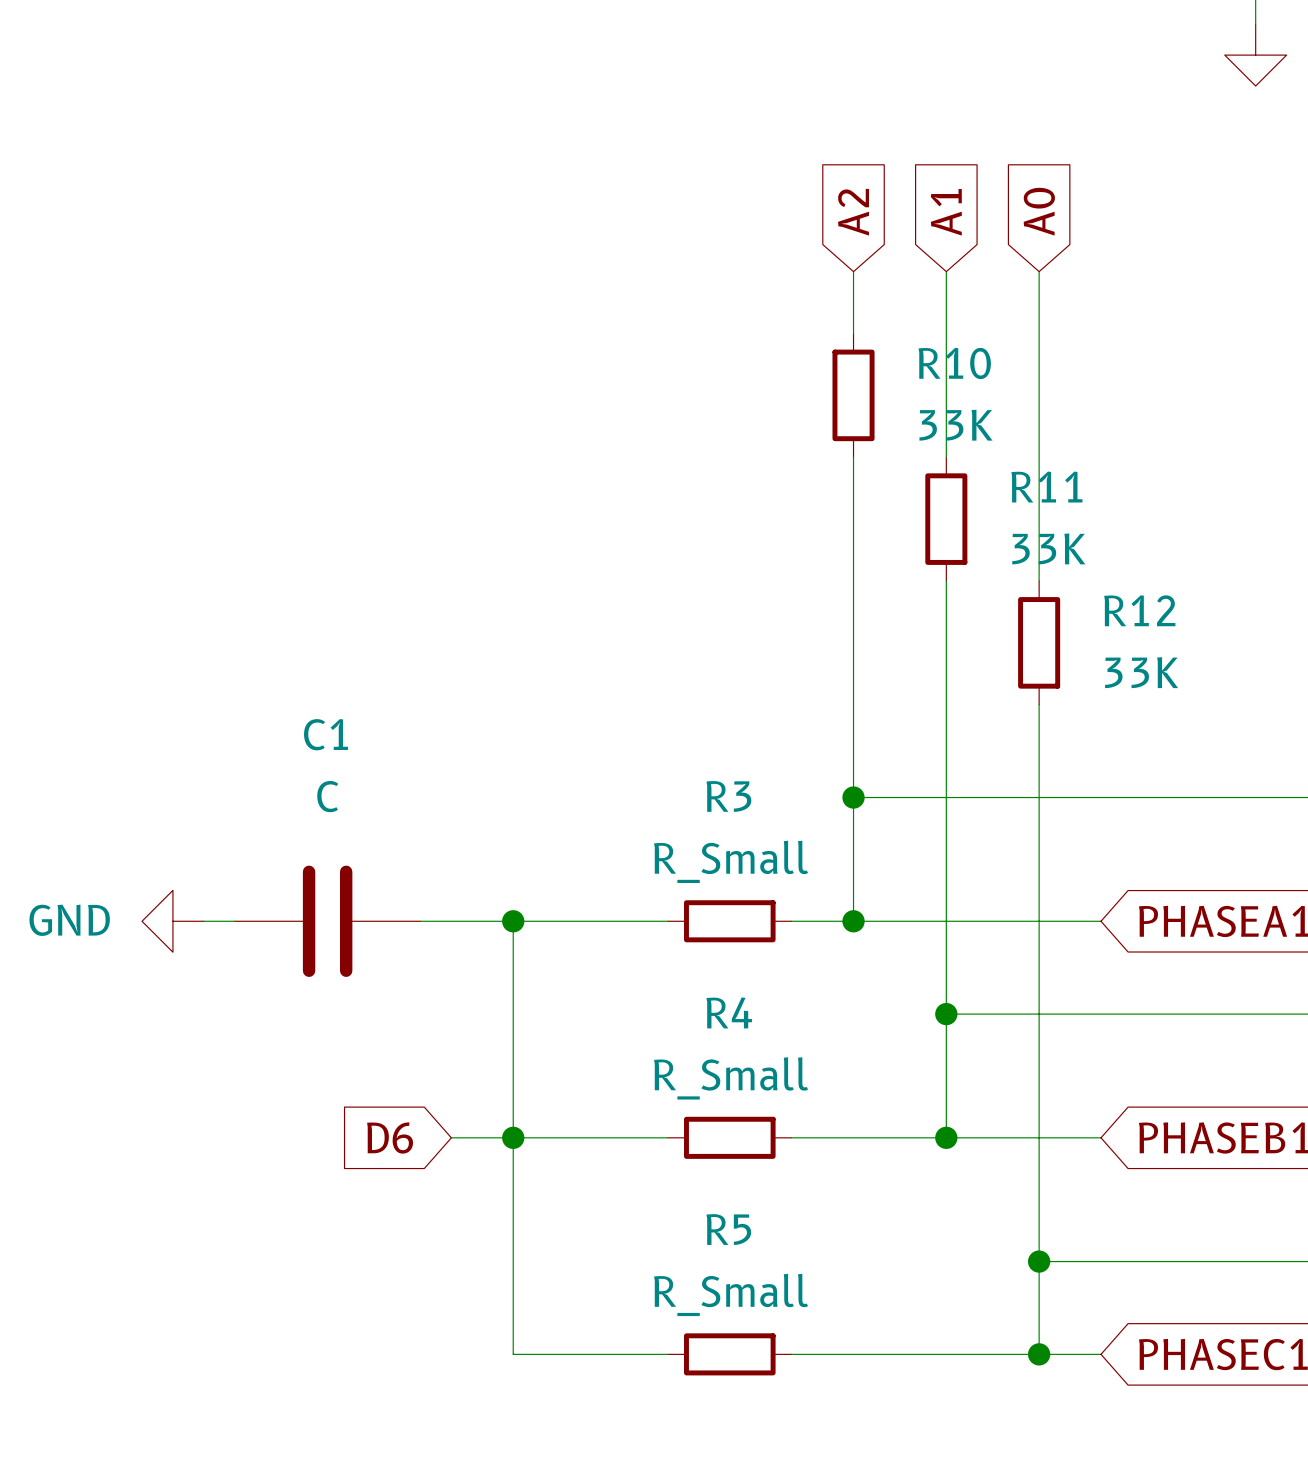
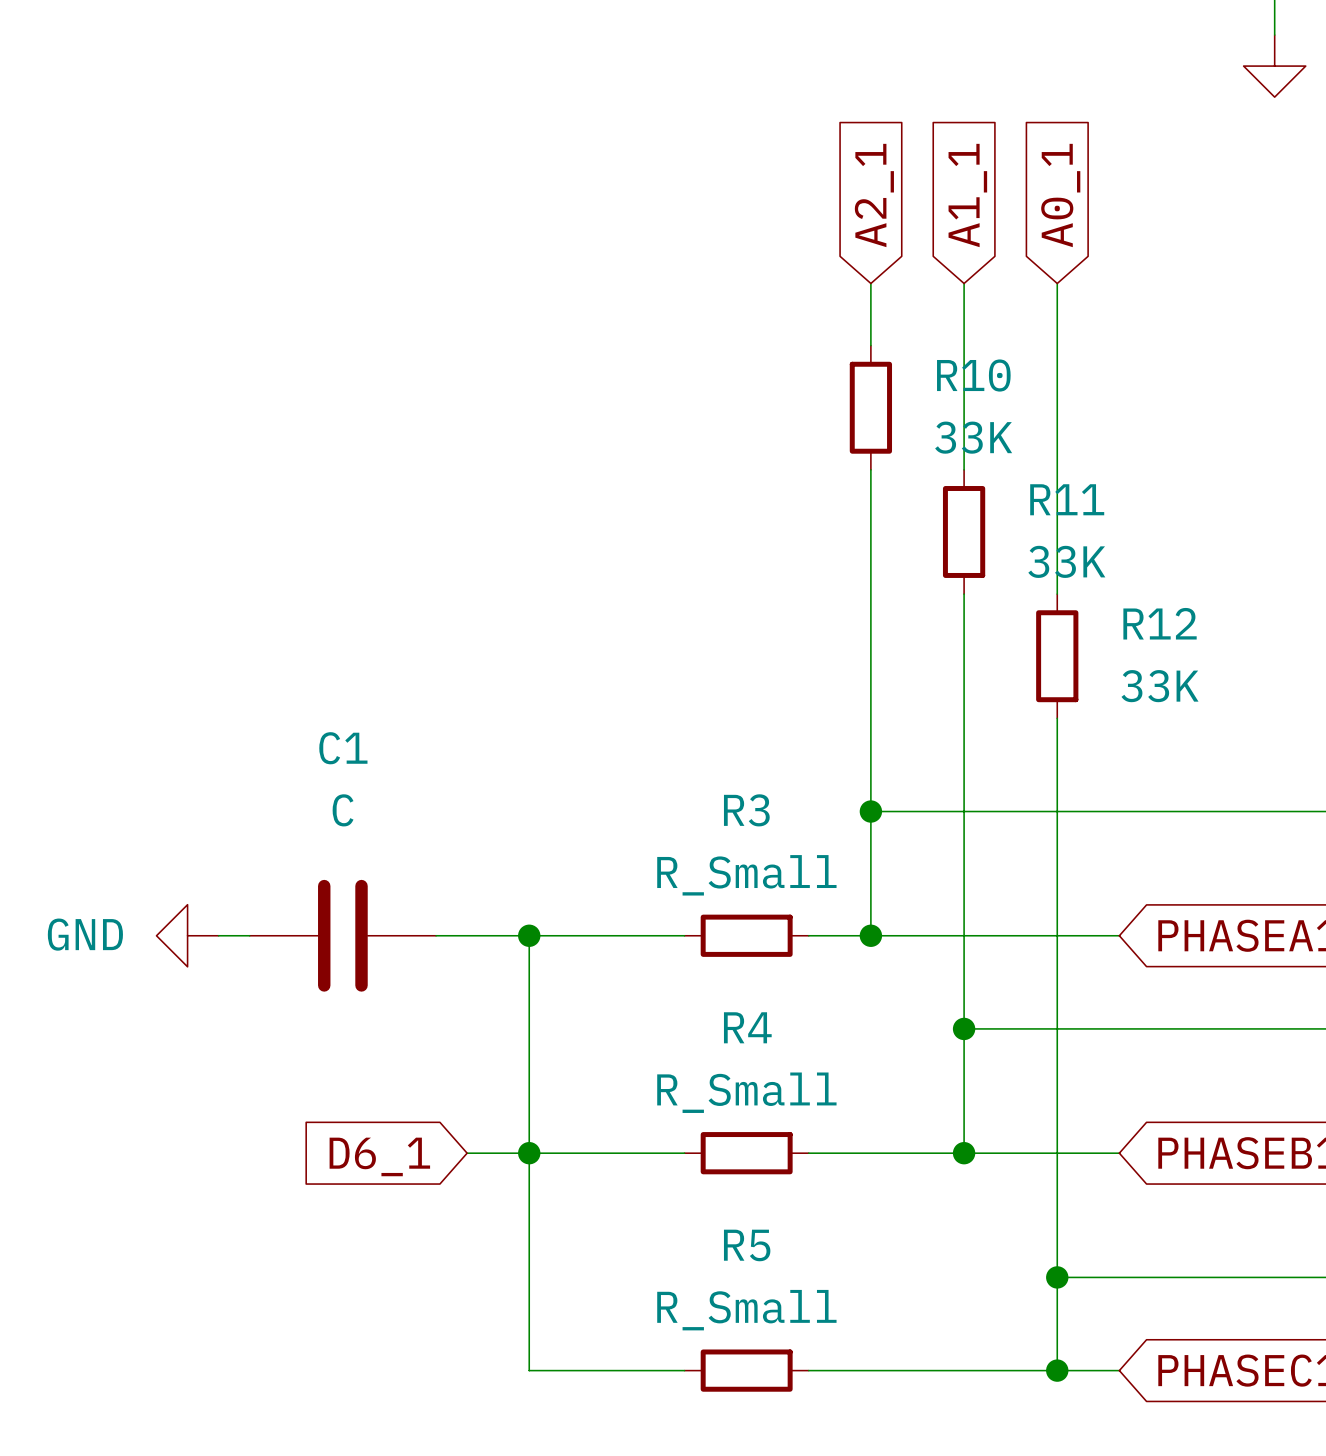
global label: A0 (1039, 211) -> A0_1 (1060, 195)
global label: A2 (853, 212) -> A2_1 (874, 195)
global label: A1 (946, 212) -> A1_1 (967, 195)
global label: D6 (390, 1138) -> D6_1 (379, 1156)

